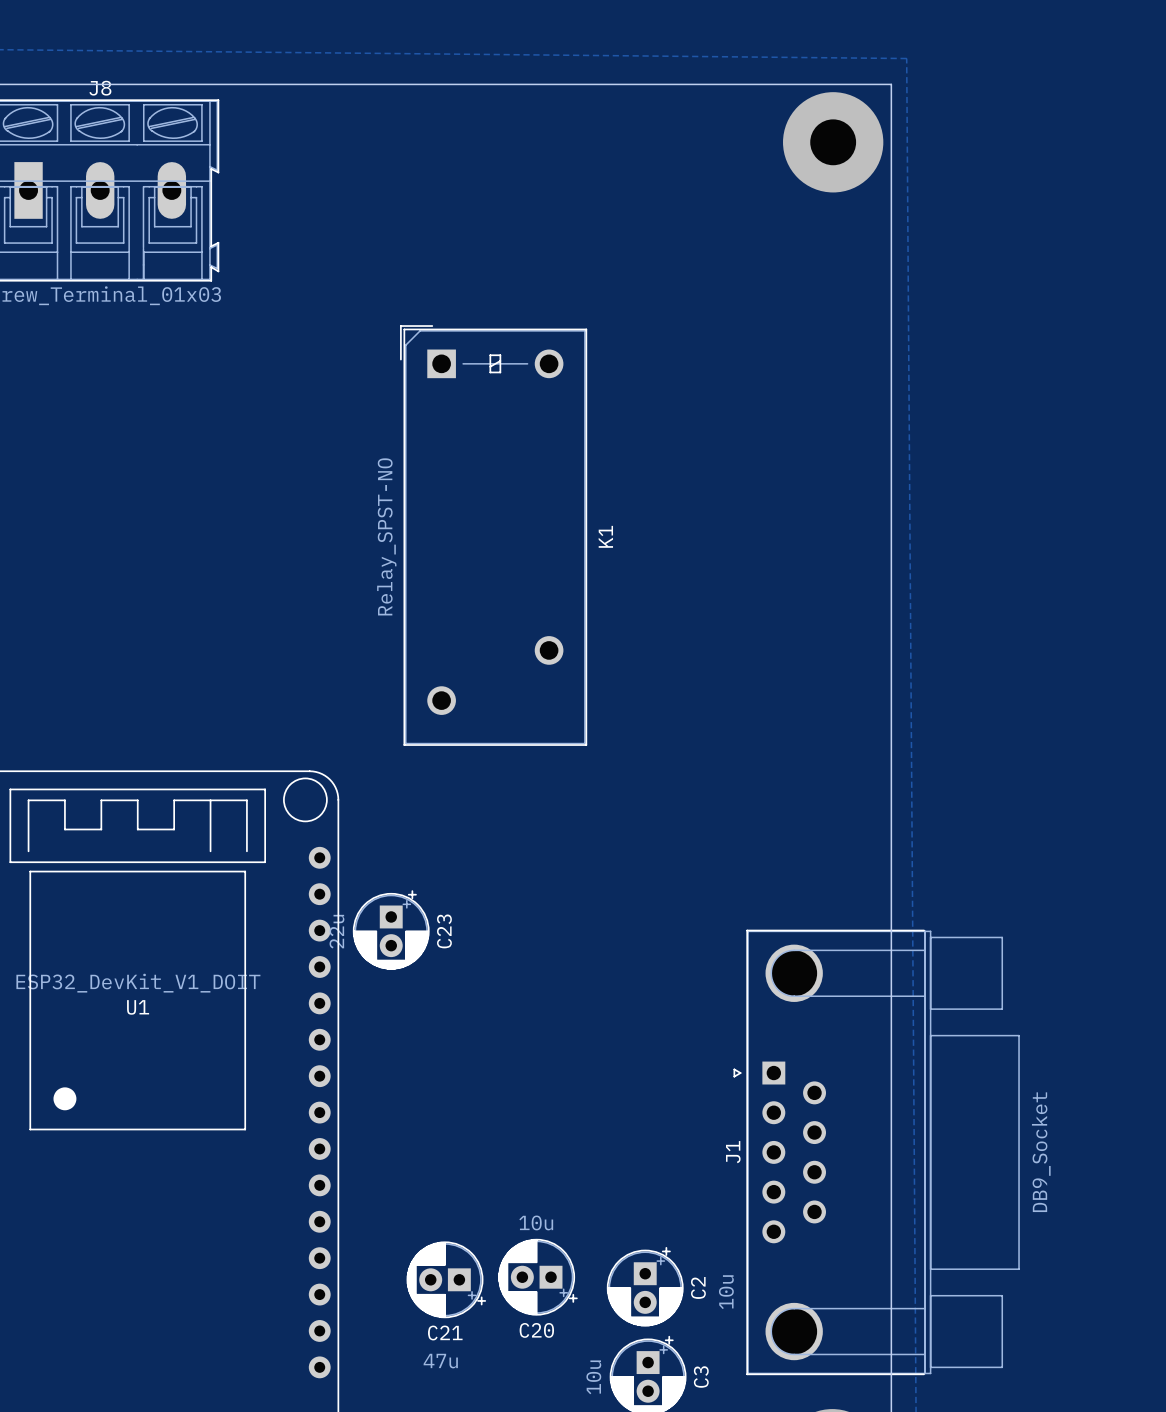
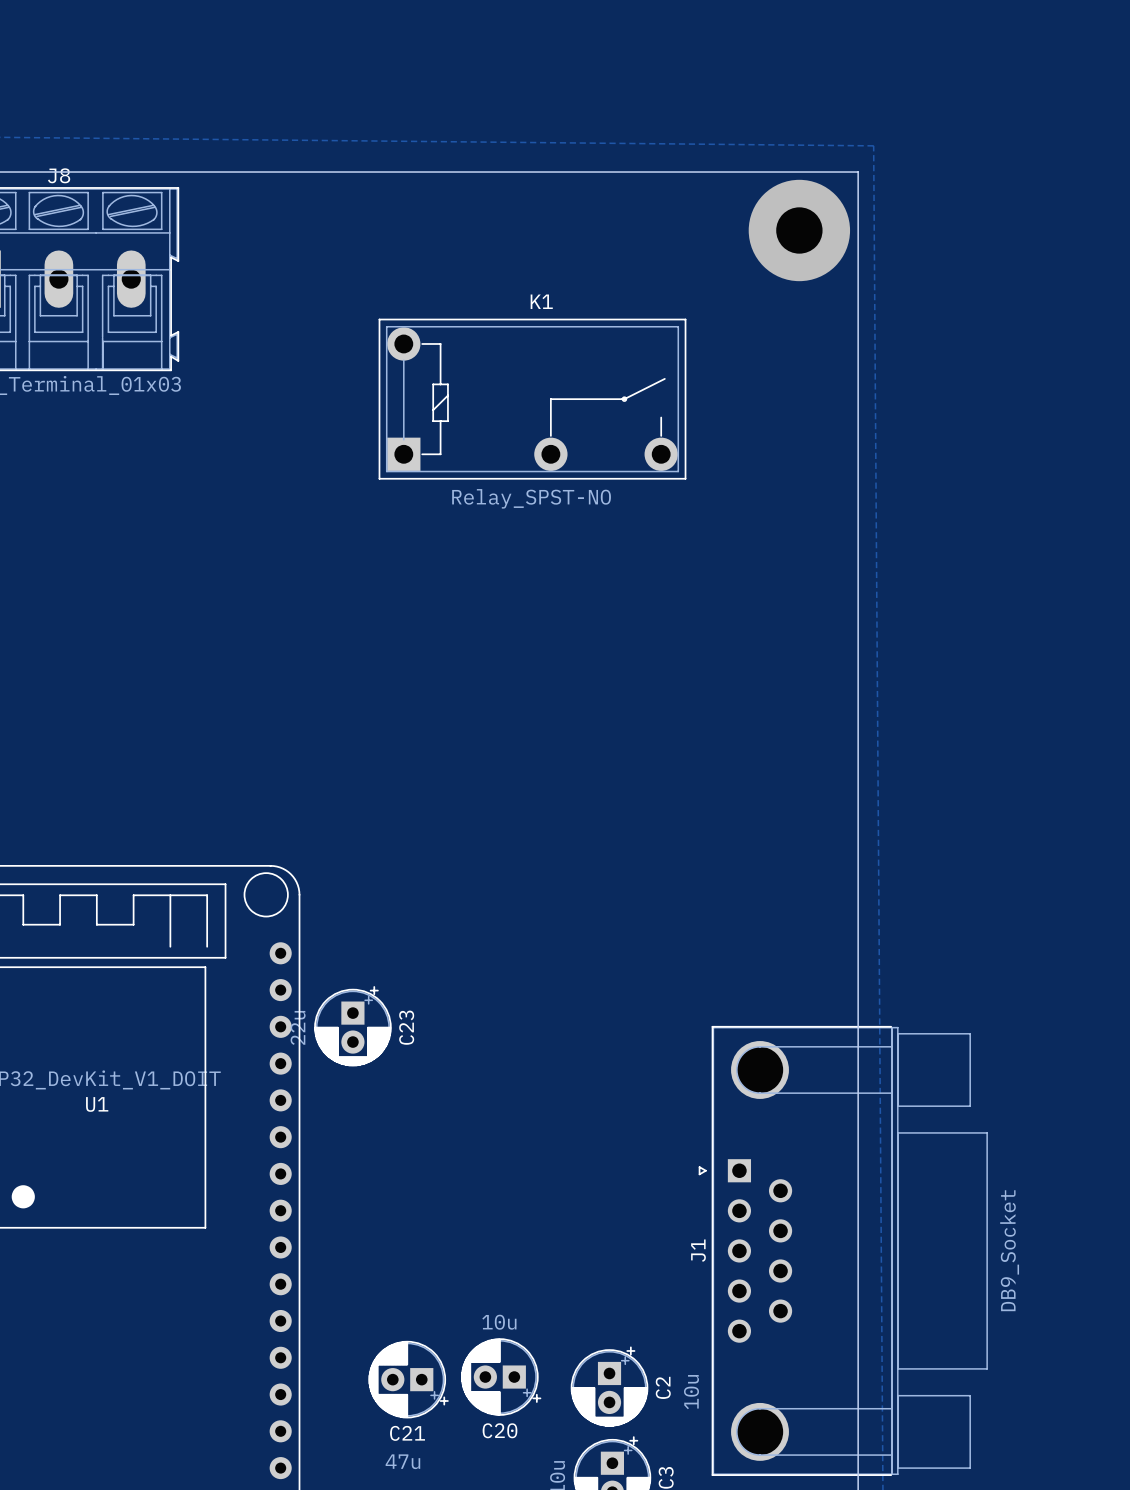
K1 footprint: [400, 325, 588, 746] -> [378, 318, 687, 480]
K1 value position: Relay_SPST-NO (386, 536) -> Relay_SPST-NO (531, 498)
K1 name position: K1 (605, 536) -> K1 (541, 301)

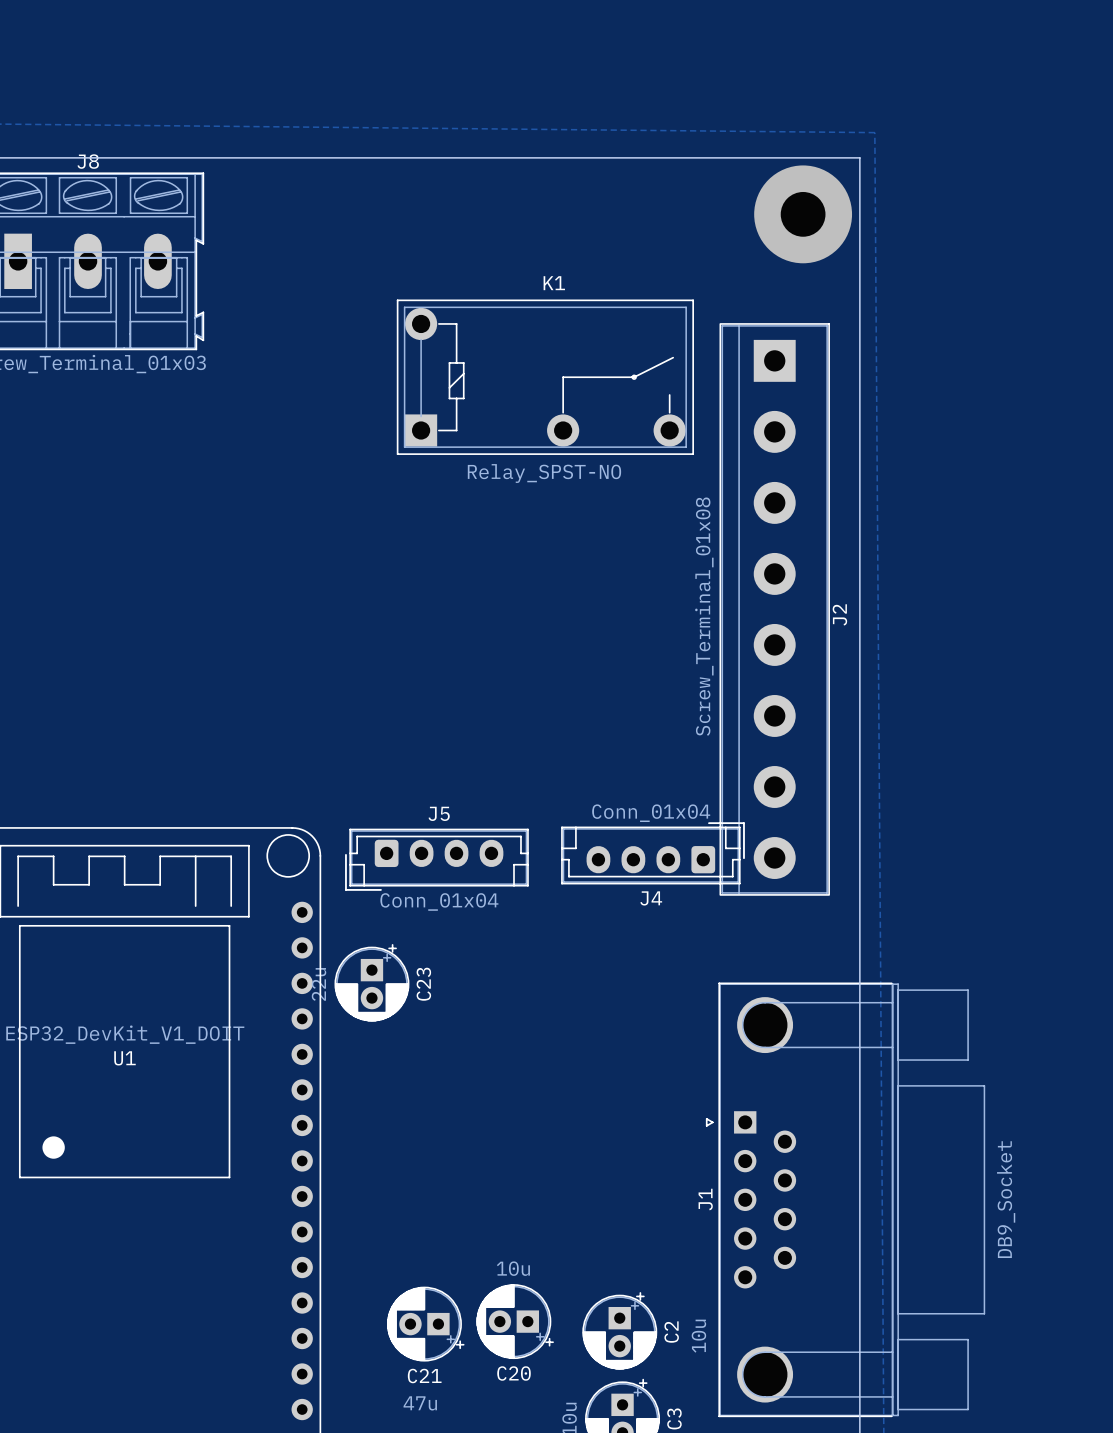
J2: none -> Screw_Terminal_01x08 (774, 609)
J4: none -> Conn_01x04 (652, 853)
J5: none -> Conn_01x04 (436, 859)

